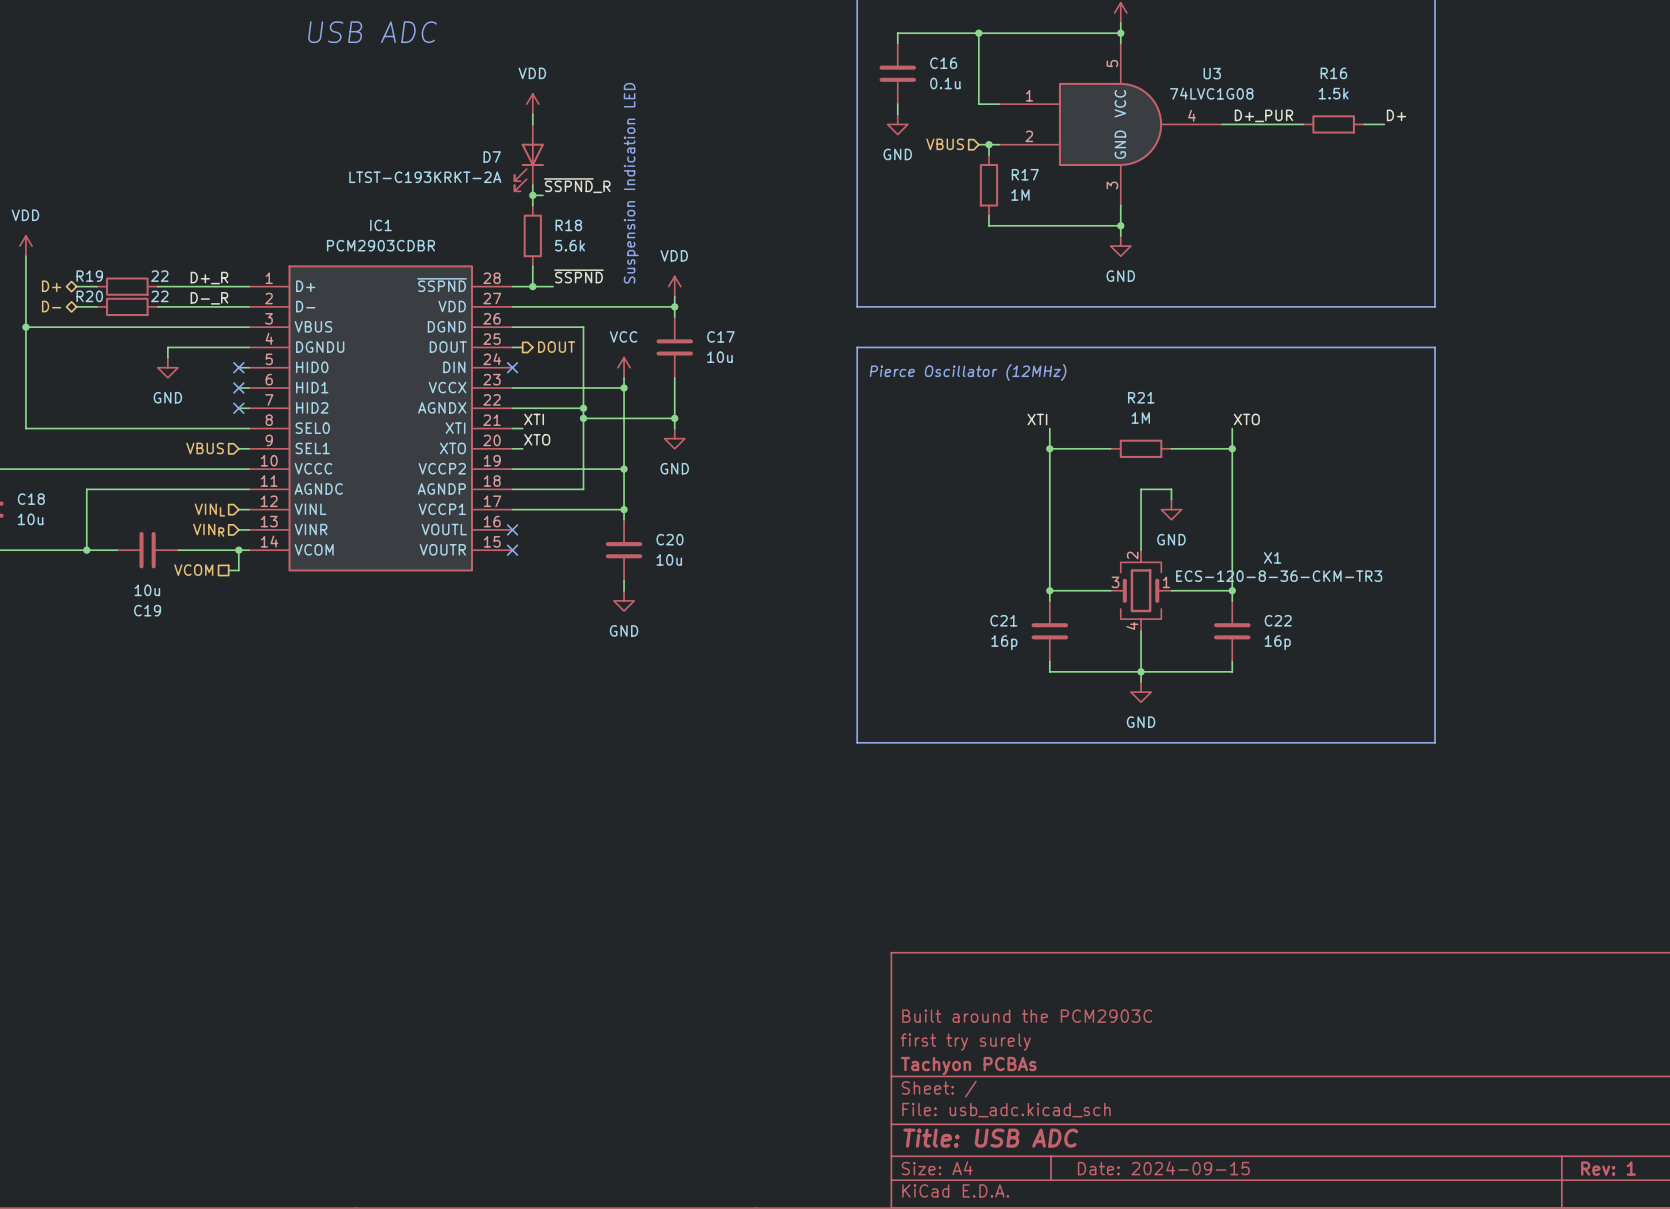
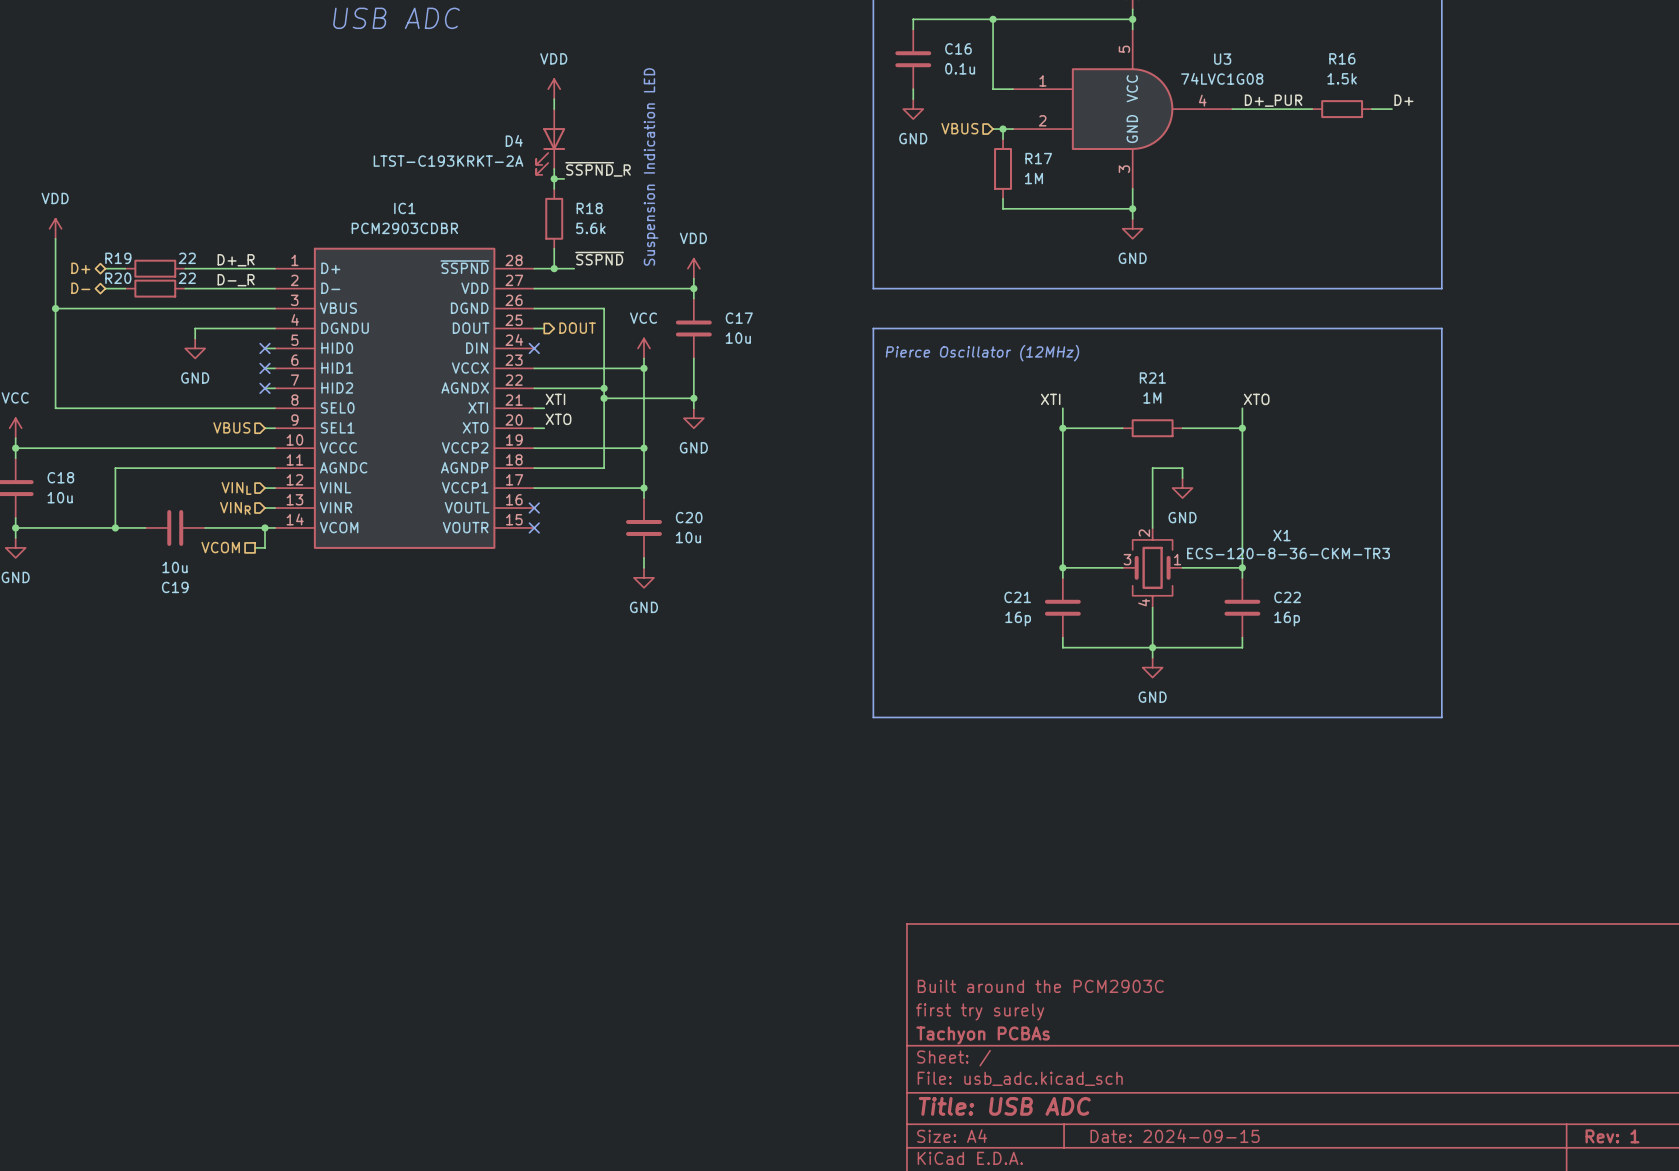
D7 name: D7 (492, 156) -> D4 (514, 140)

